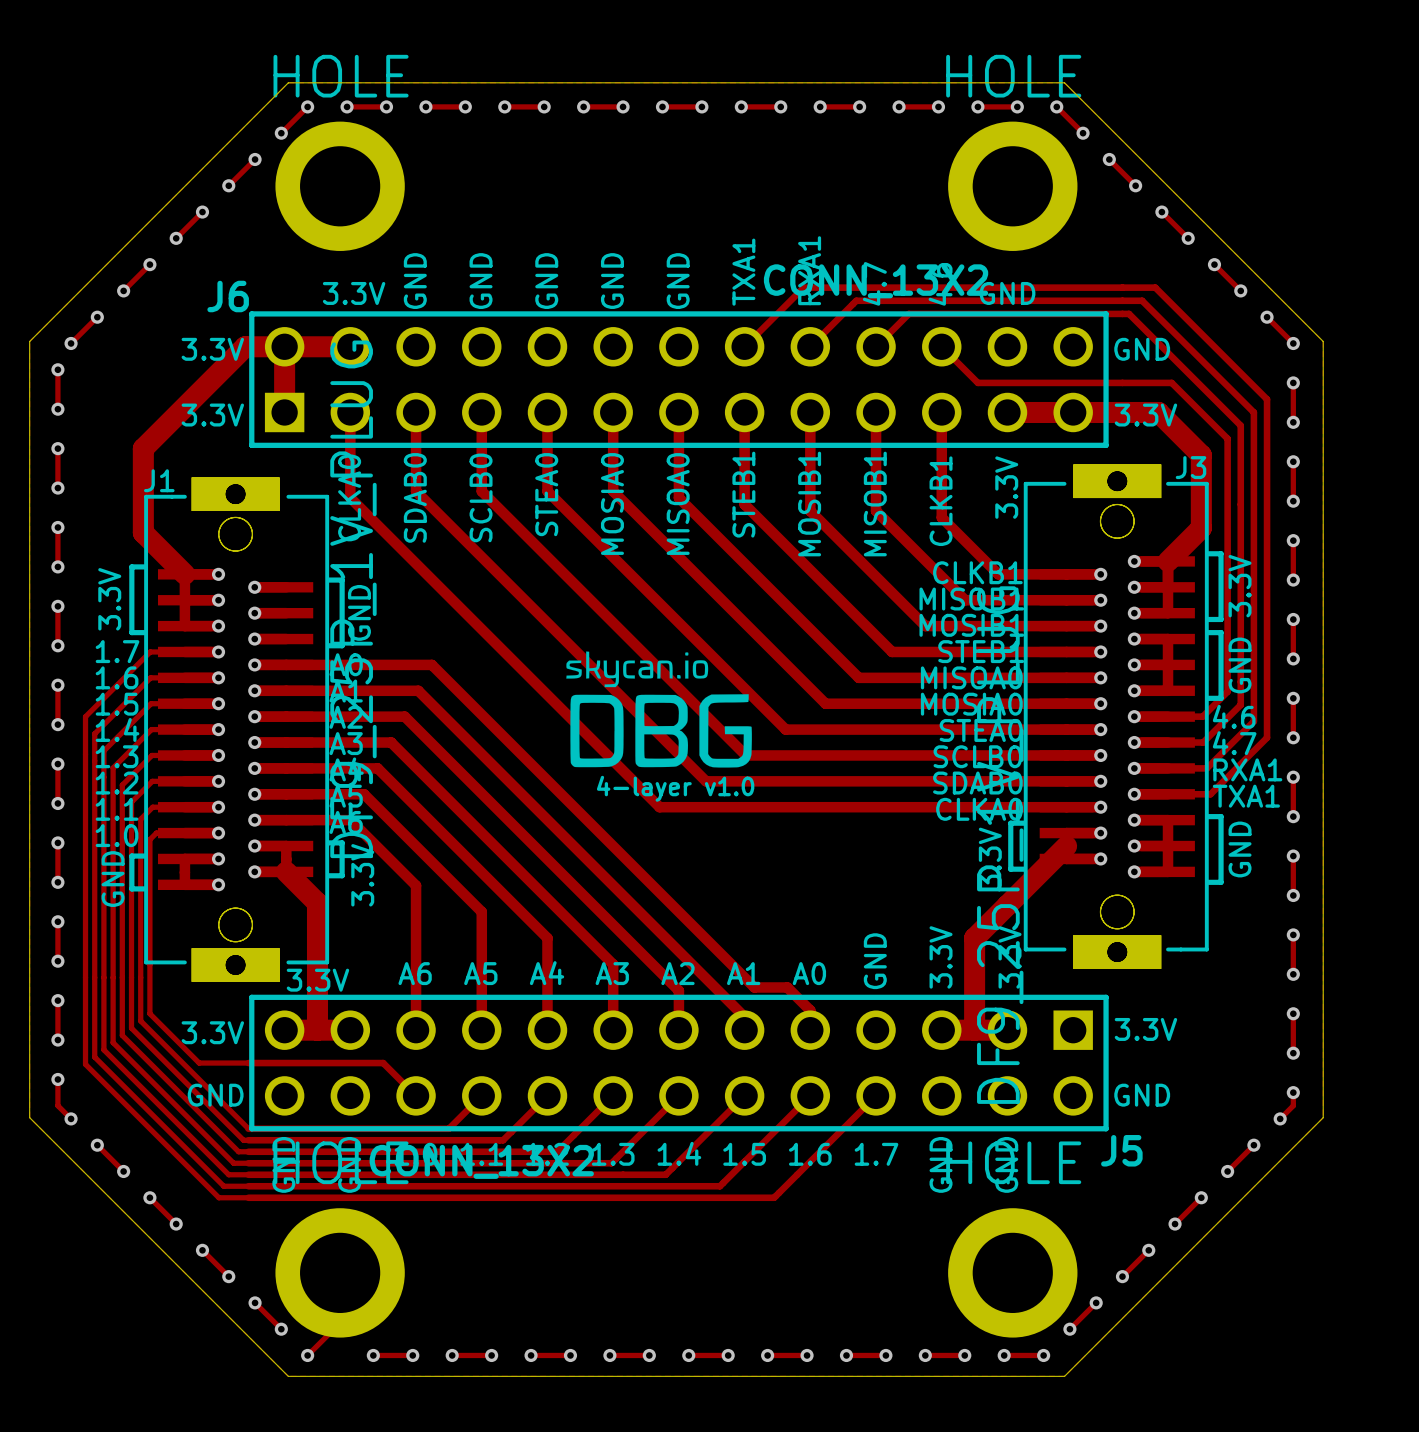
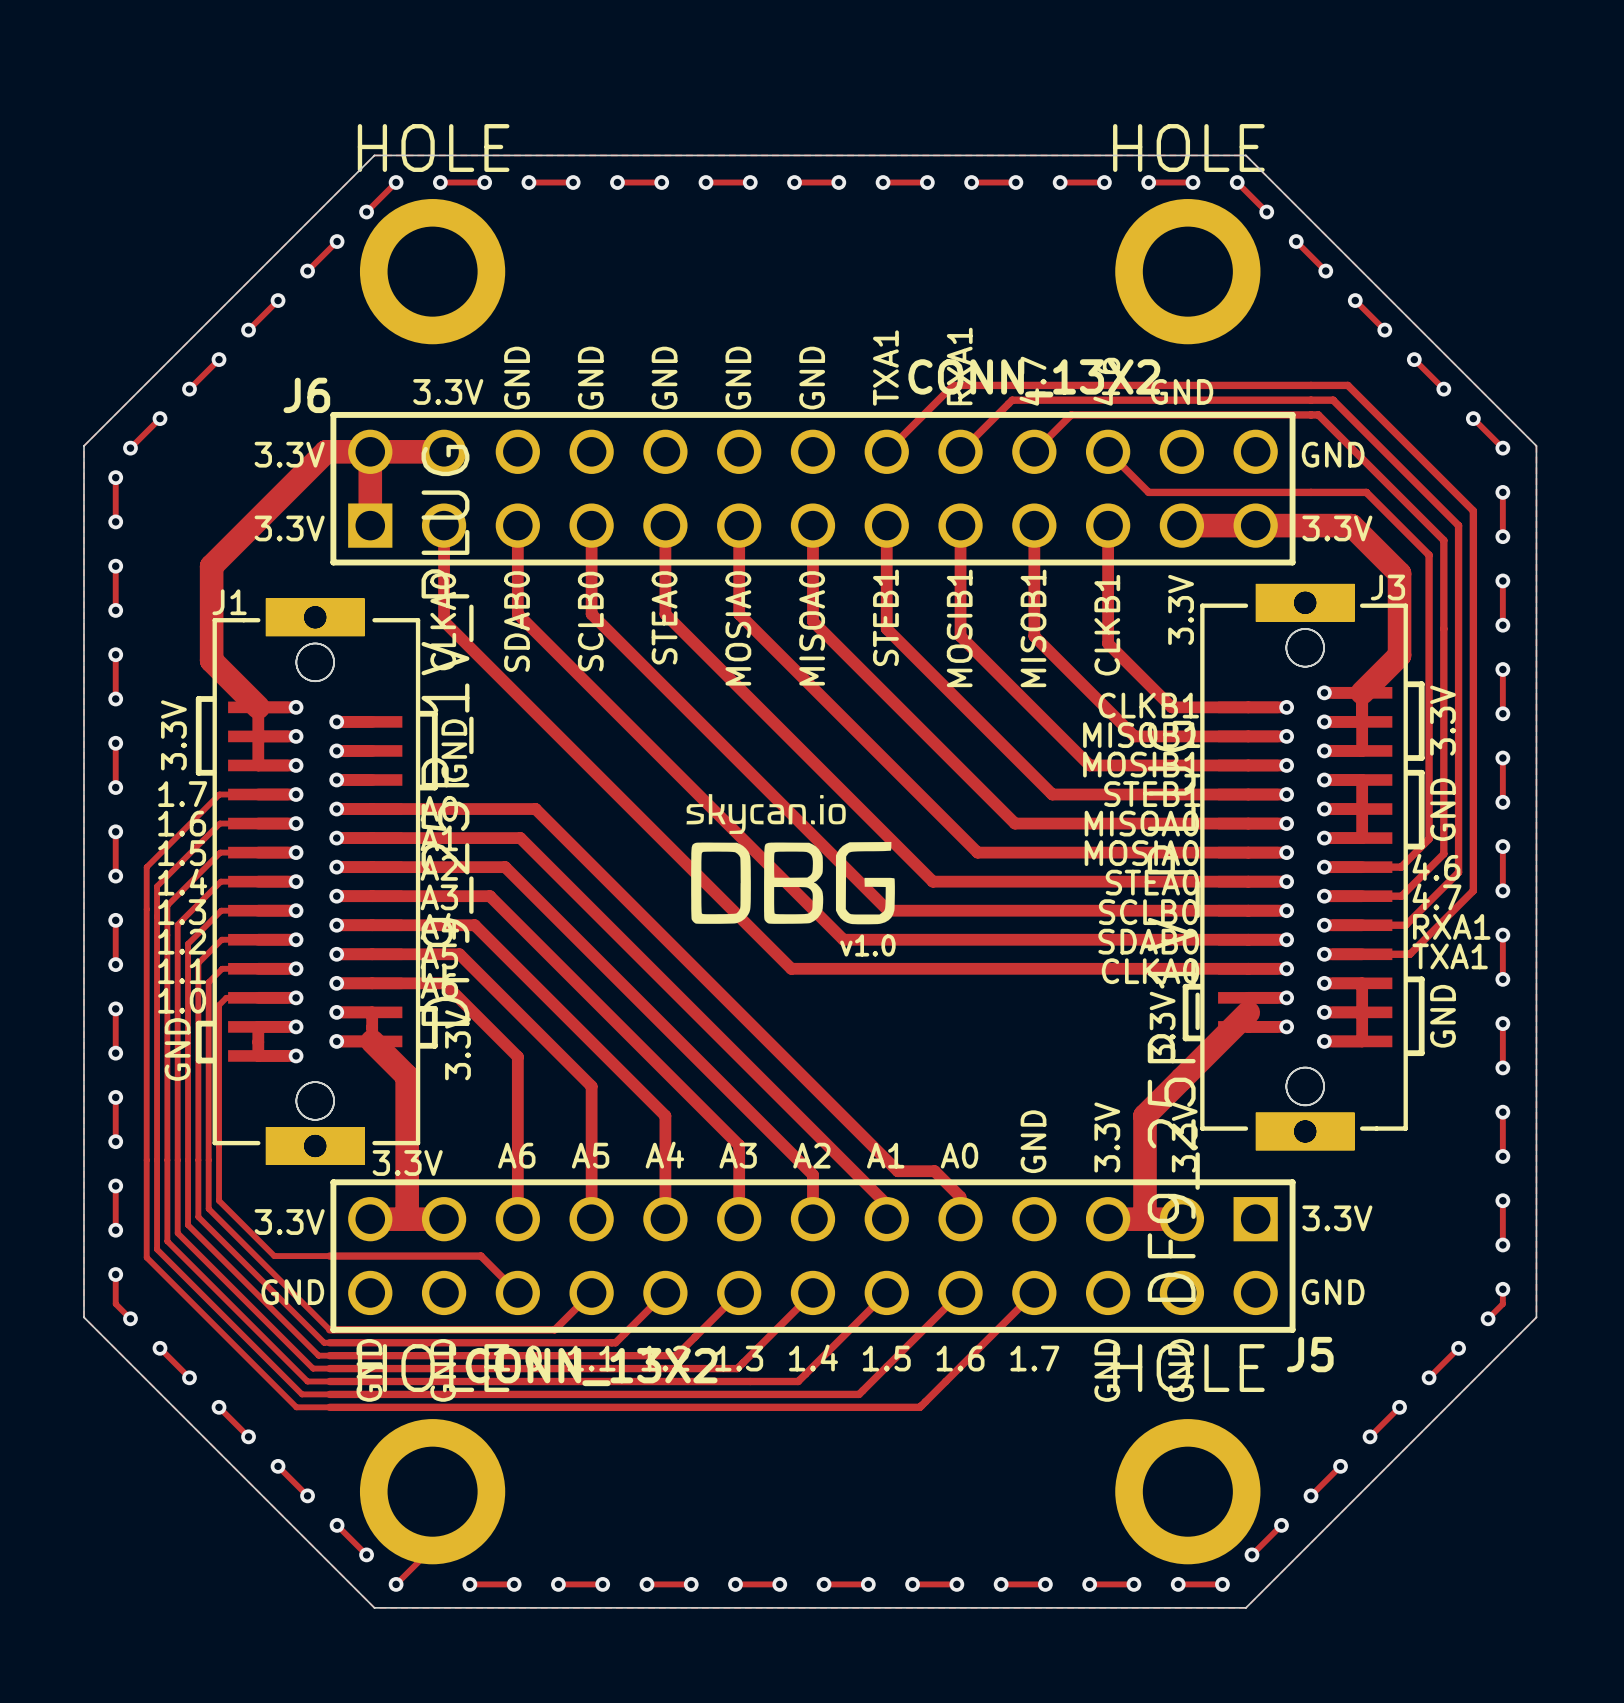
text: none -> v1.0 (867, 945)
text: 4-layer v1.0 (675, 788) -> none

